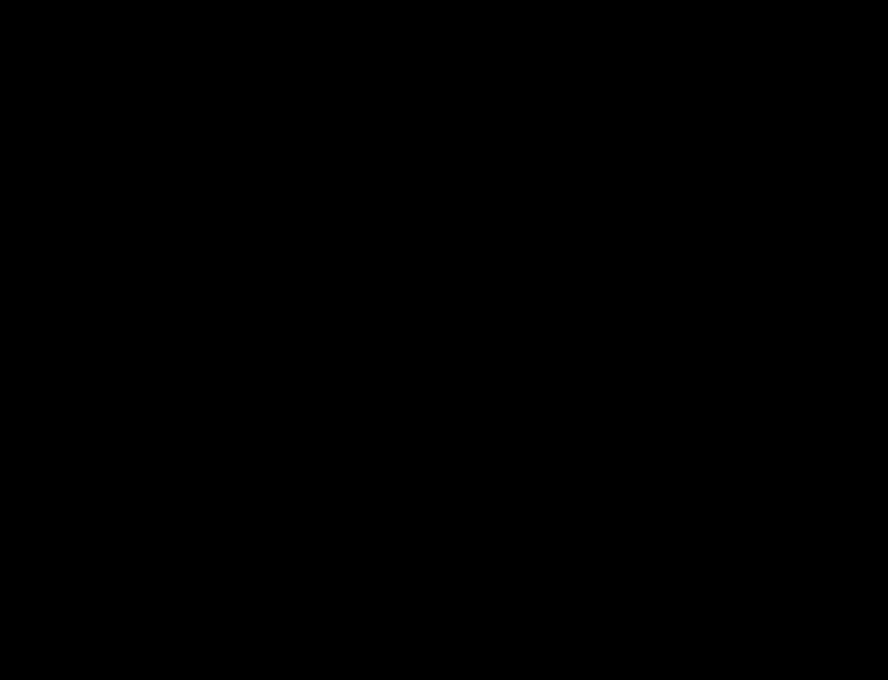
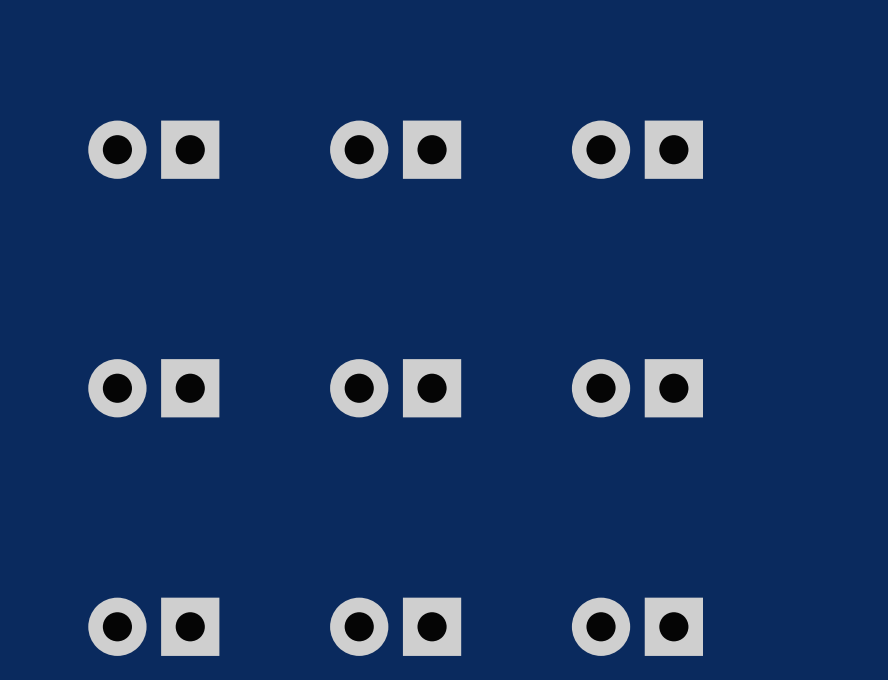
part: none -> (153, 149)
part: none -> (395, 149)
part: none -> (637, 149)
part: none -> (153, 388)
part: none -> (395, 388)
part: none -> (637, 388)
part: none -> (153, 626)
part: none -> (395, 626)
part: none -> (637, 626)

